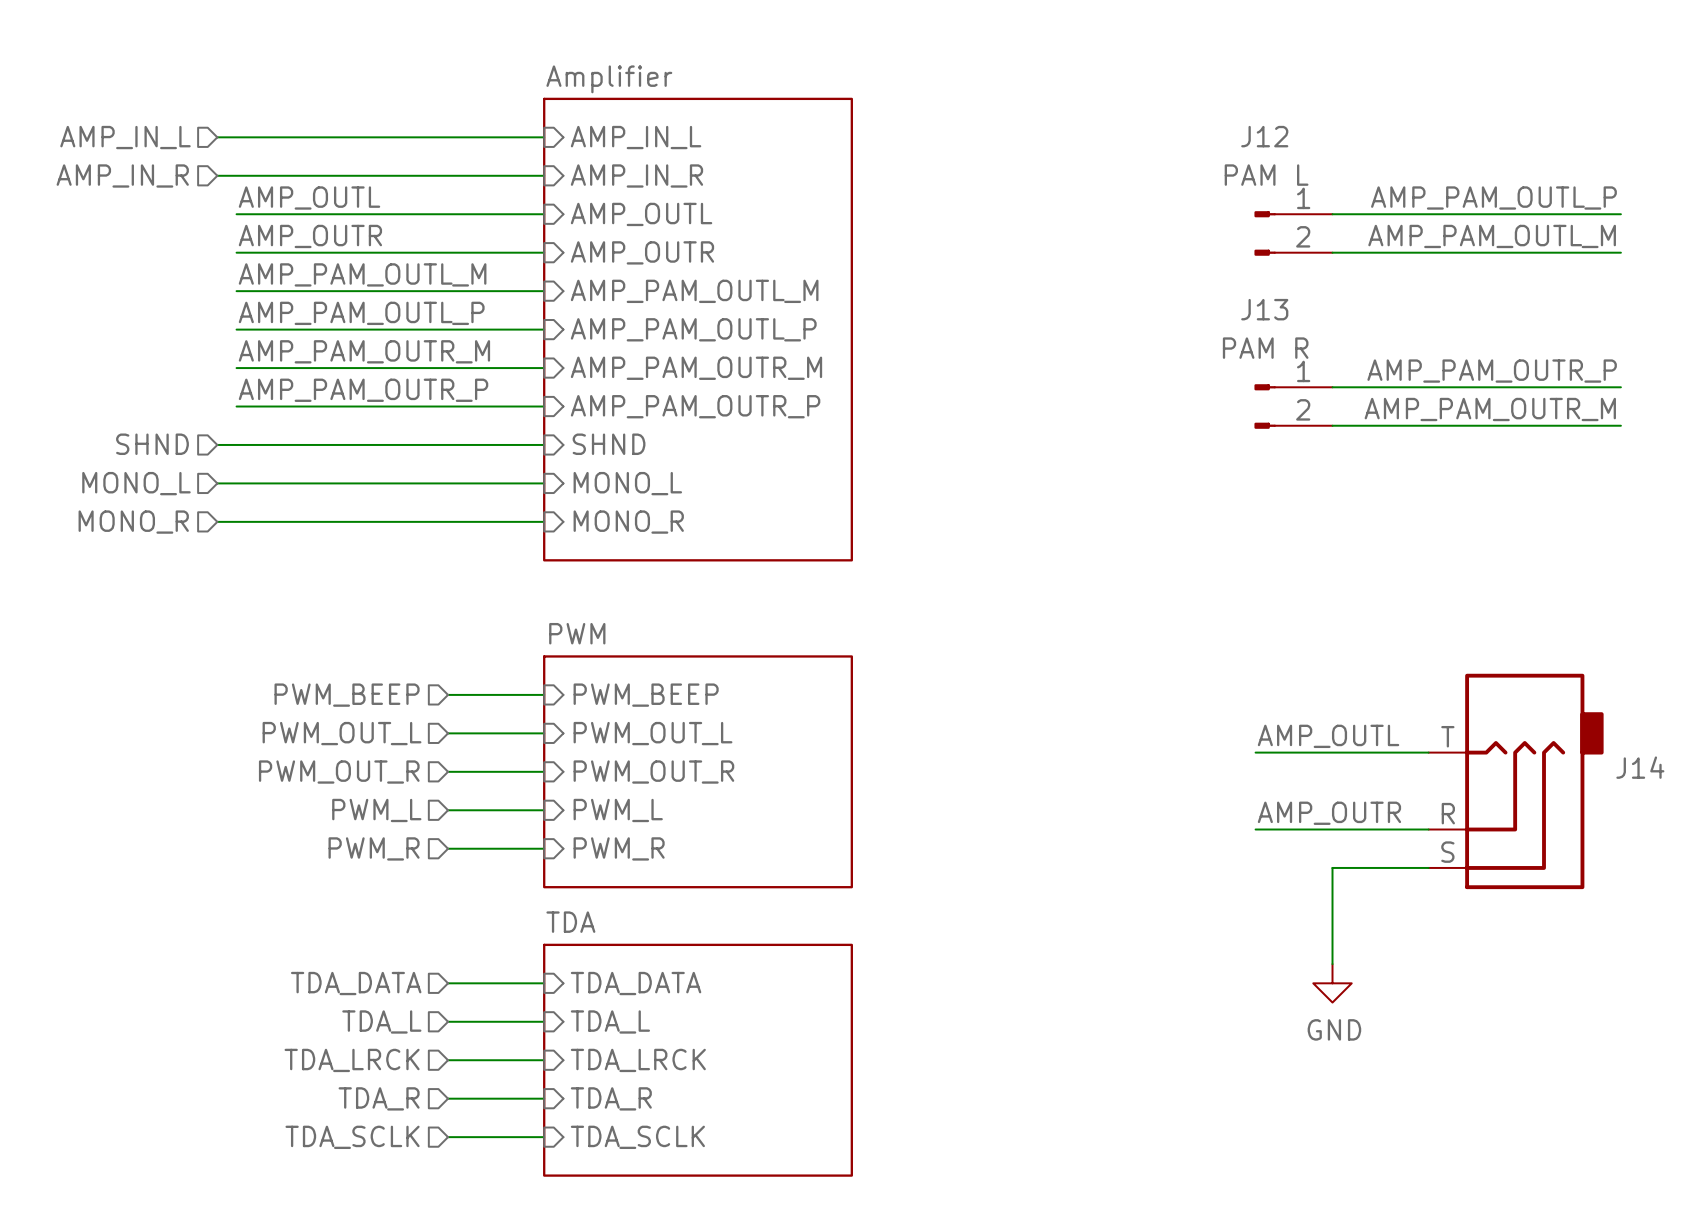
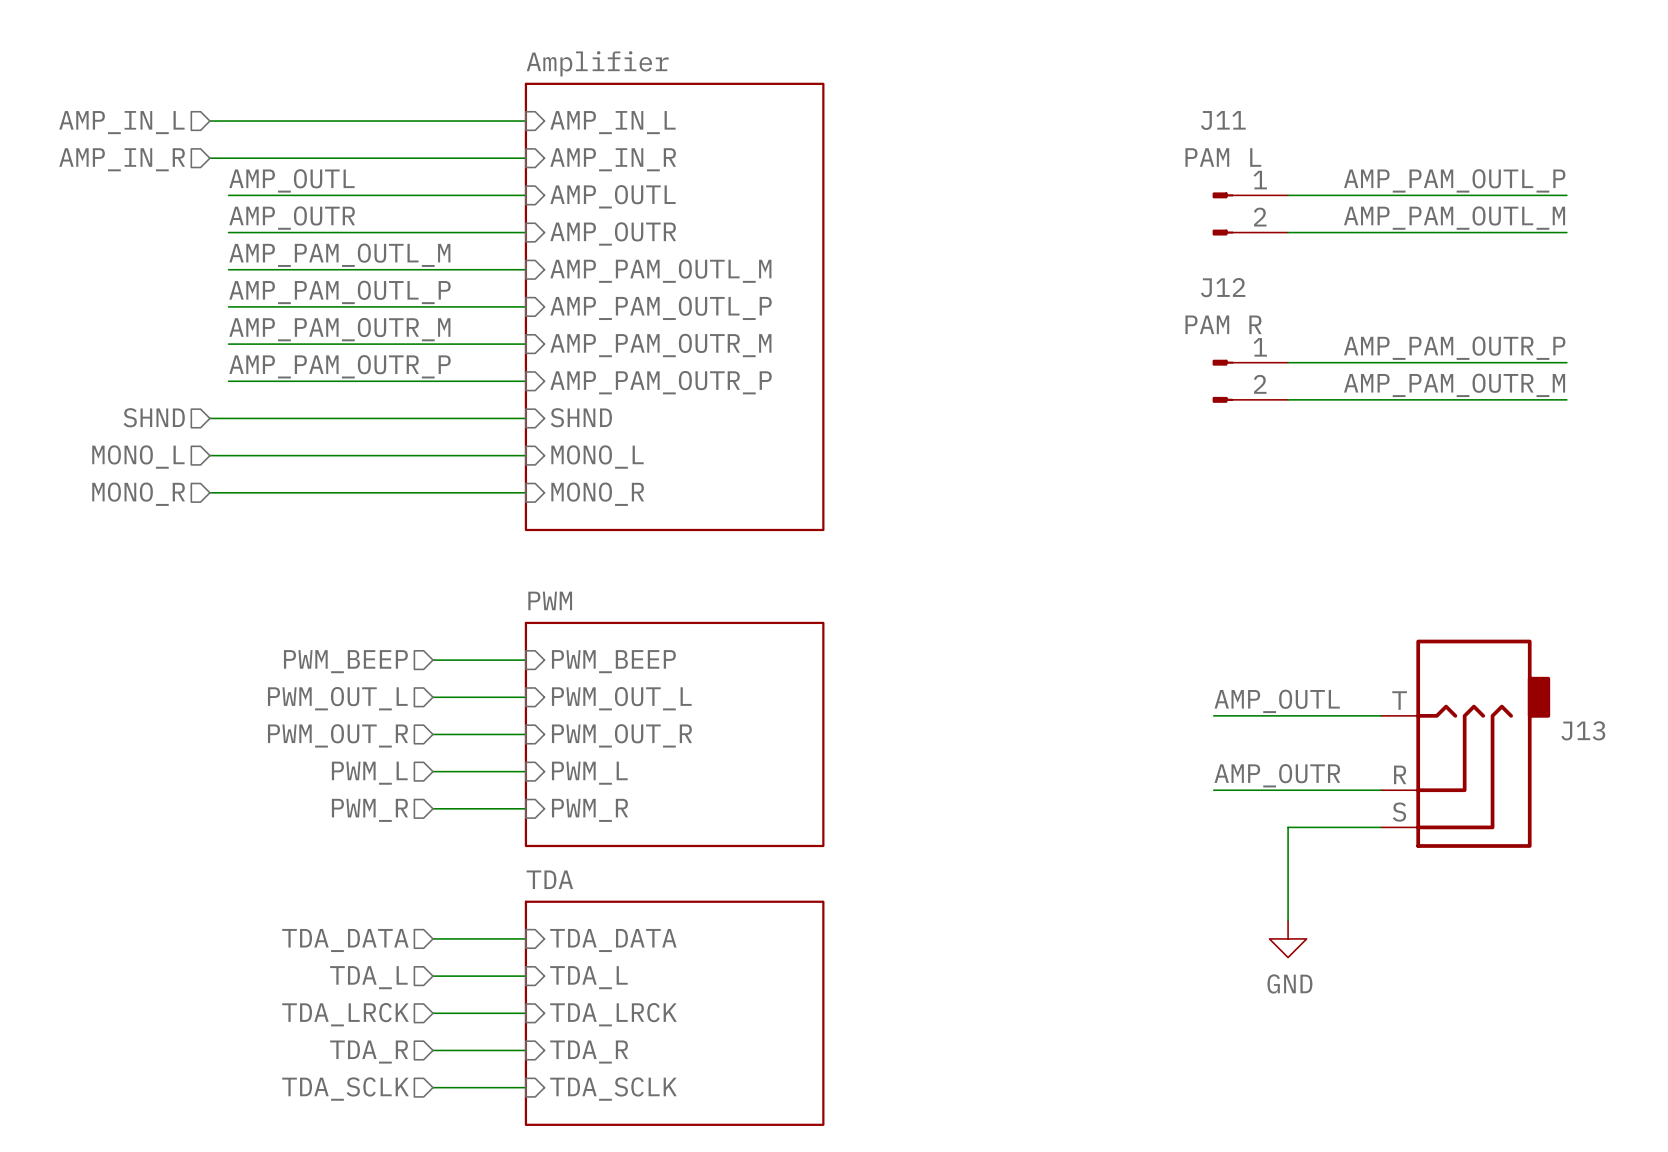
J12 name: J12 (1264, 136) -> J11 (1223, 120)
J13 name: J13 (1264, 309) -> J12 (1223, 287)
J14 name: J14 (1640, 767) -> J13 (1583, 730)

